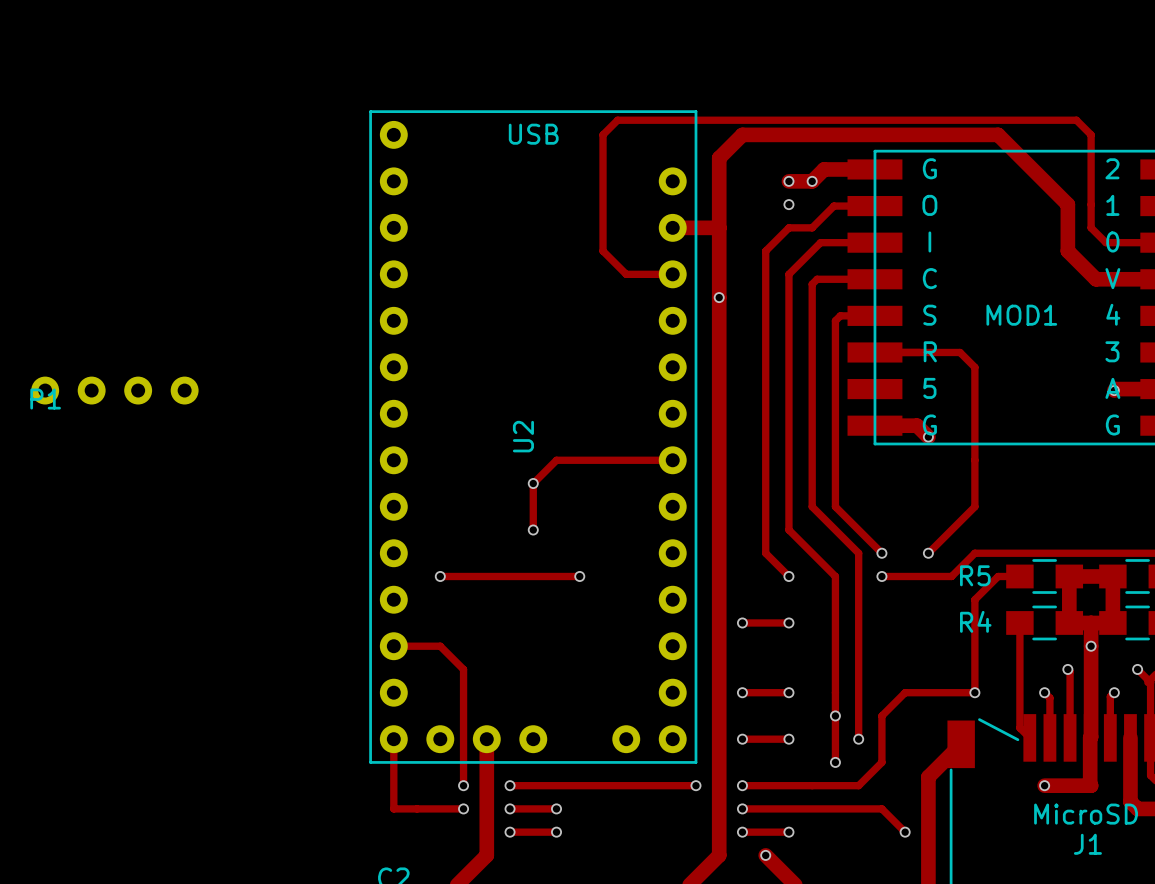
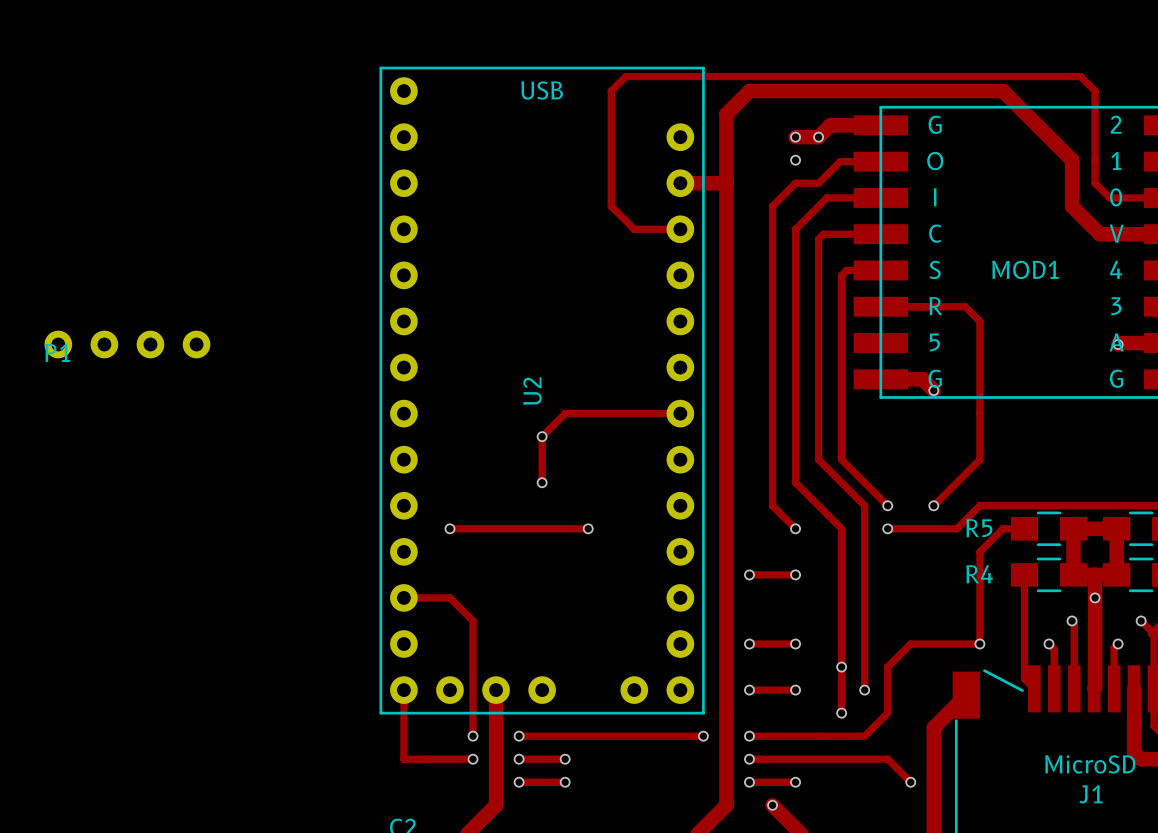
via: (719, 297) -> none
track: (1090, 737) (1091, 785) (1044, 785) -> none
via: (1044, 785) -> none

